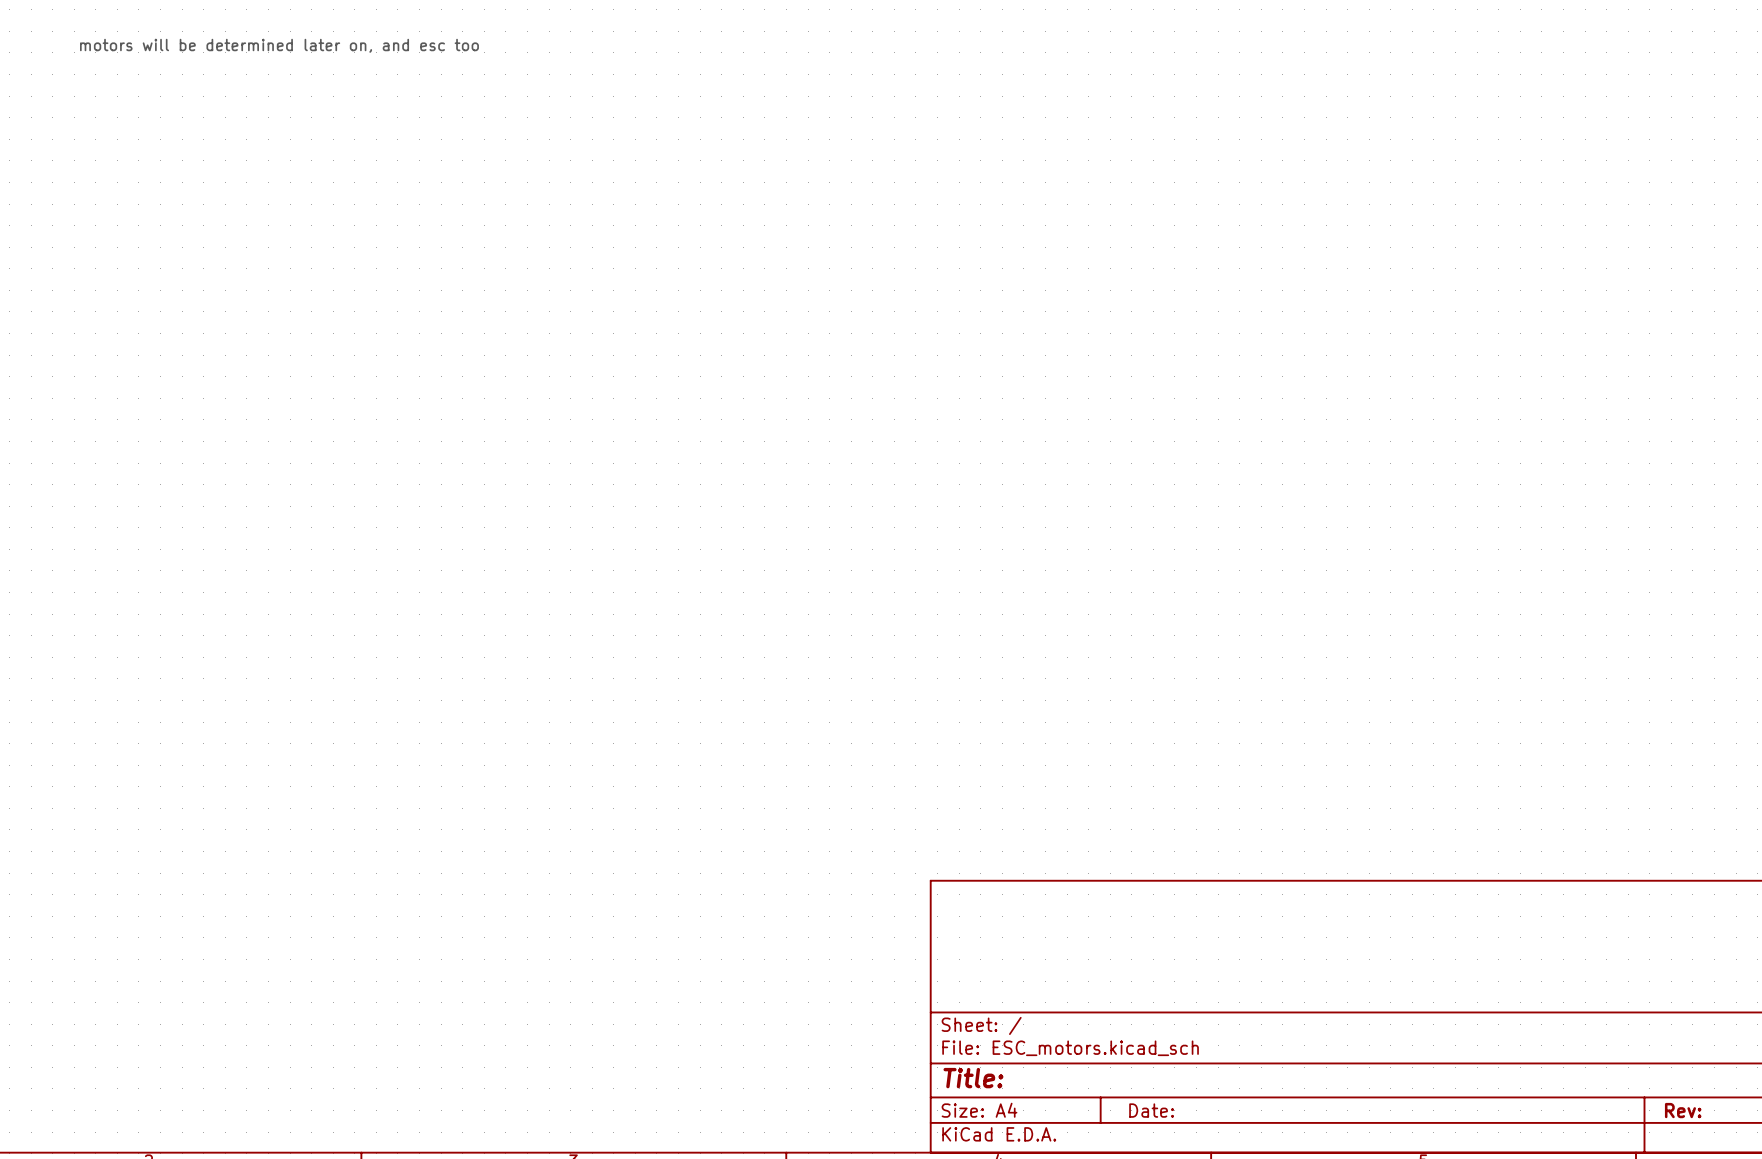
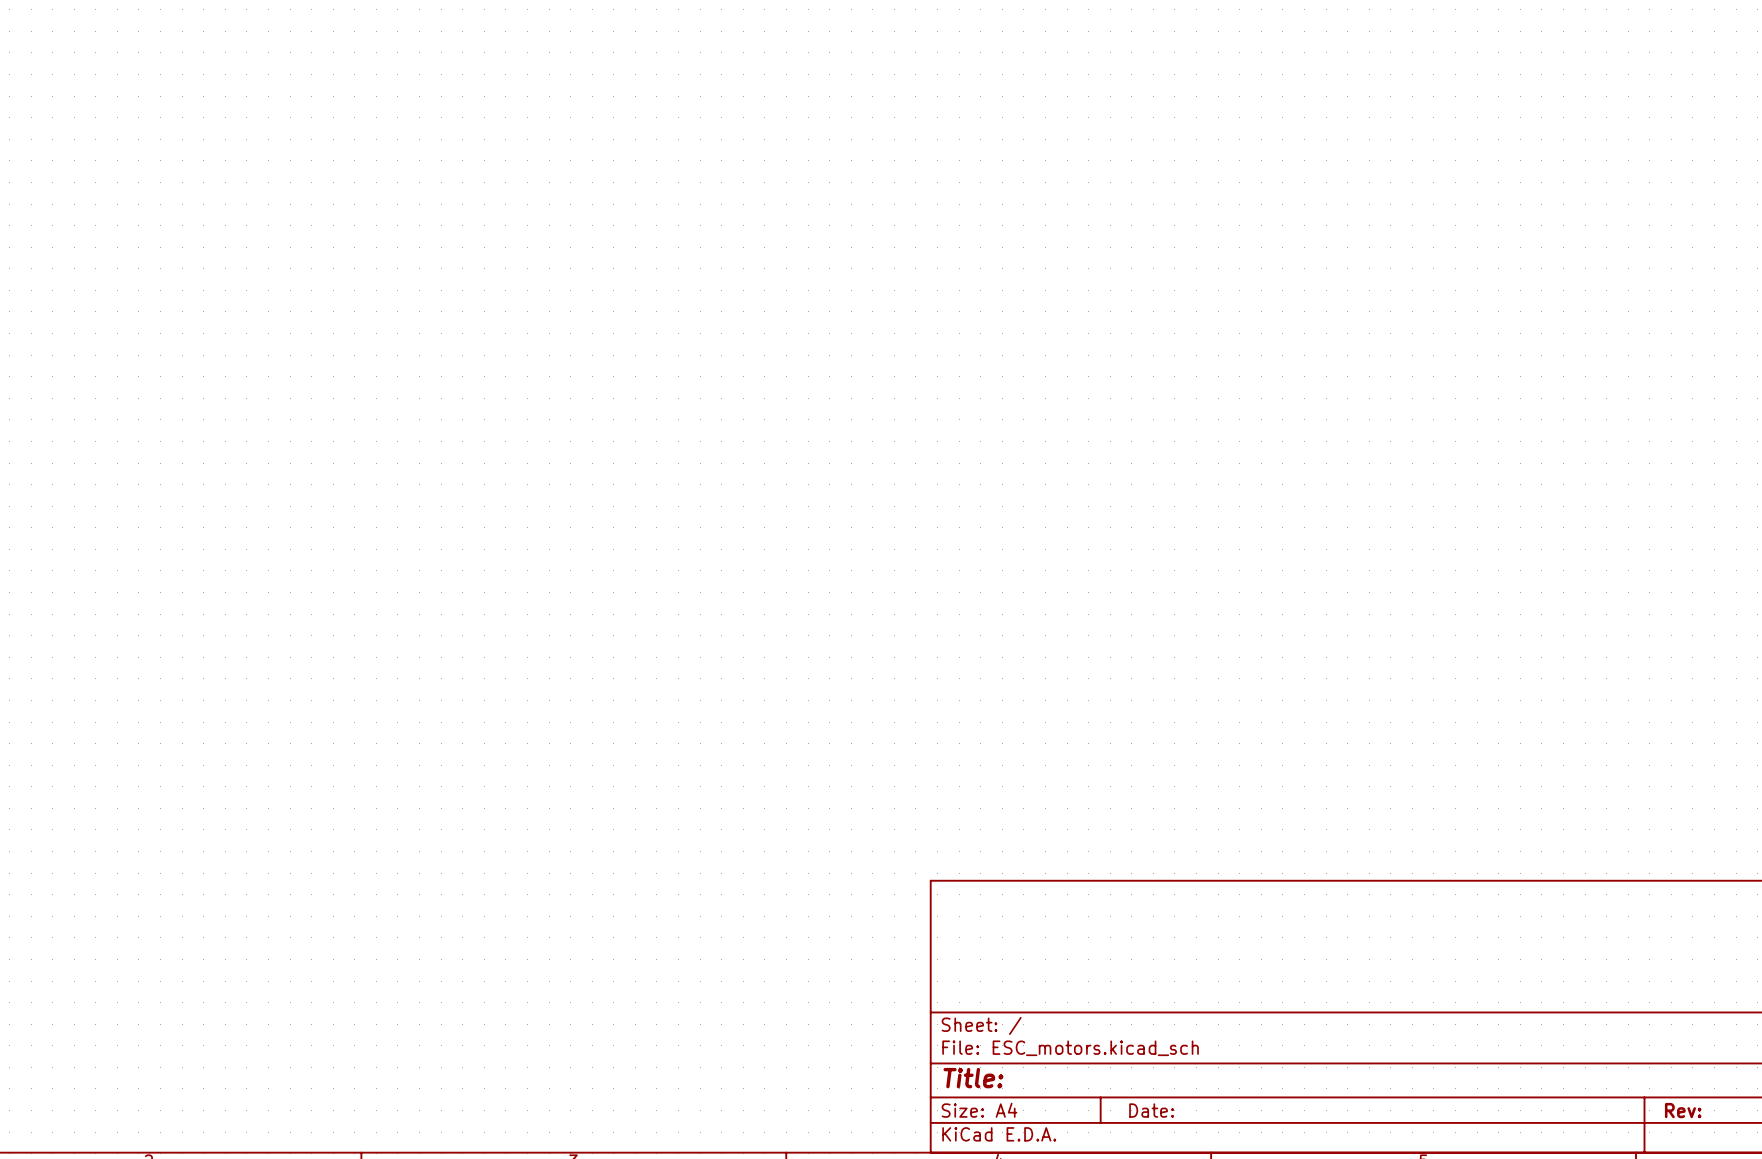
text: motors will be determined later on, and esc too (279, 45) -> none

